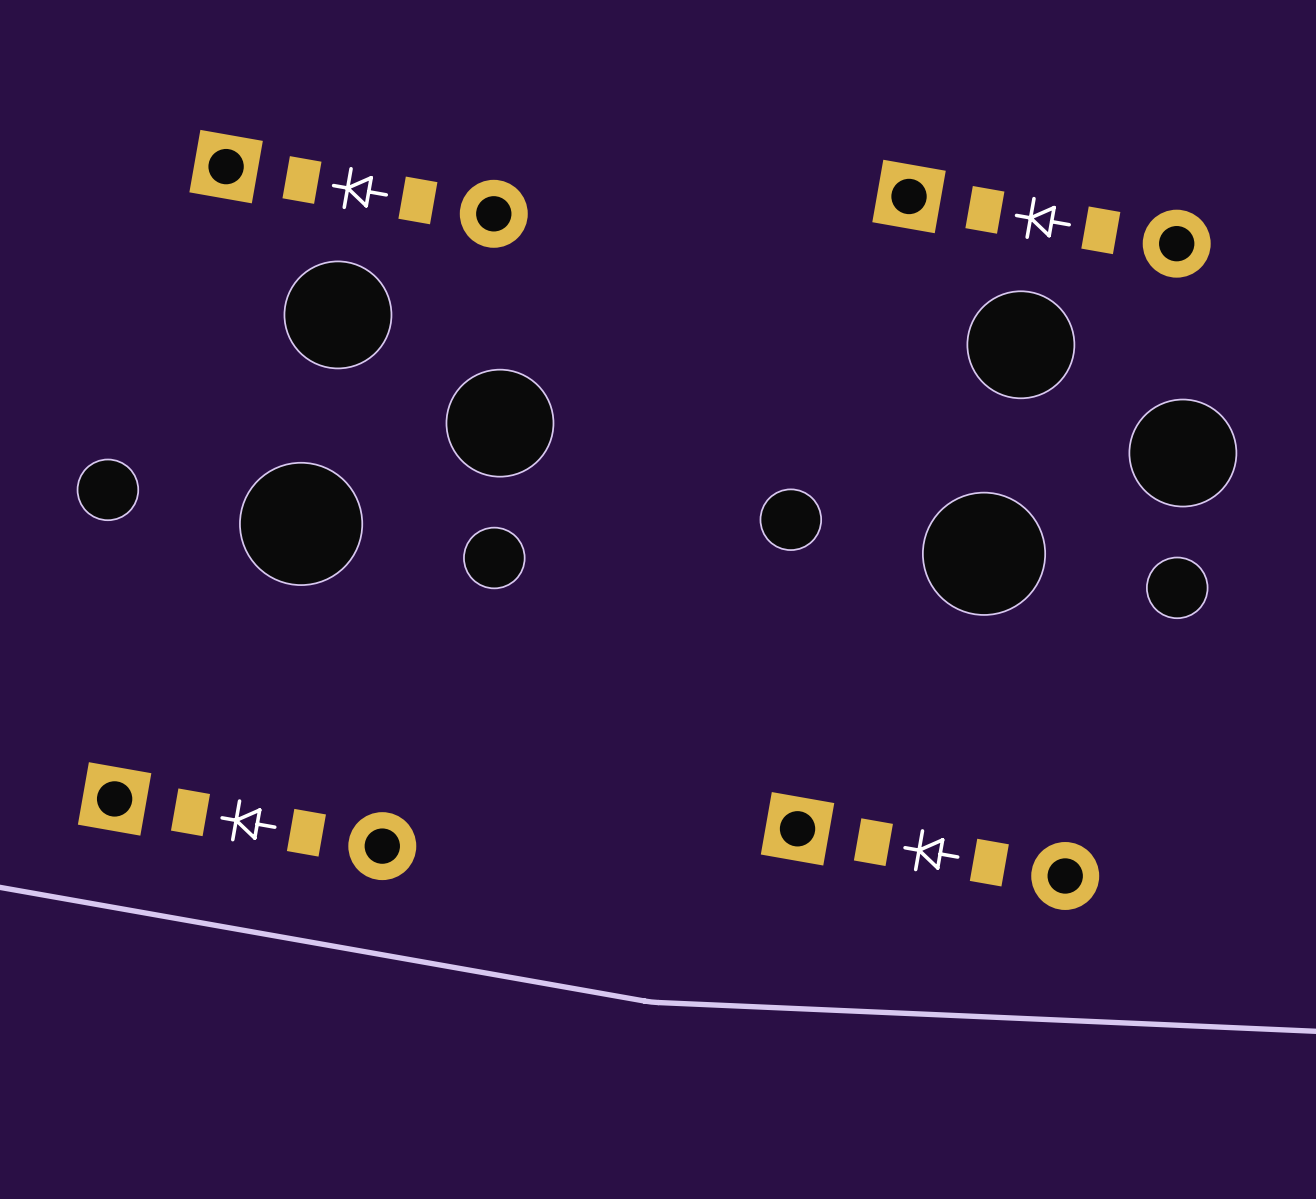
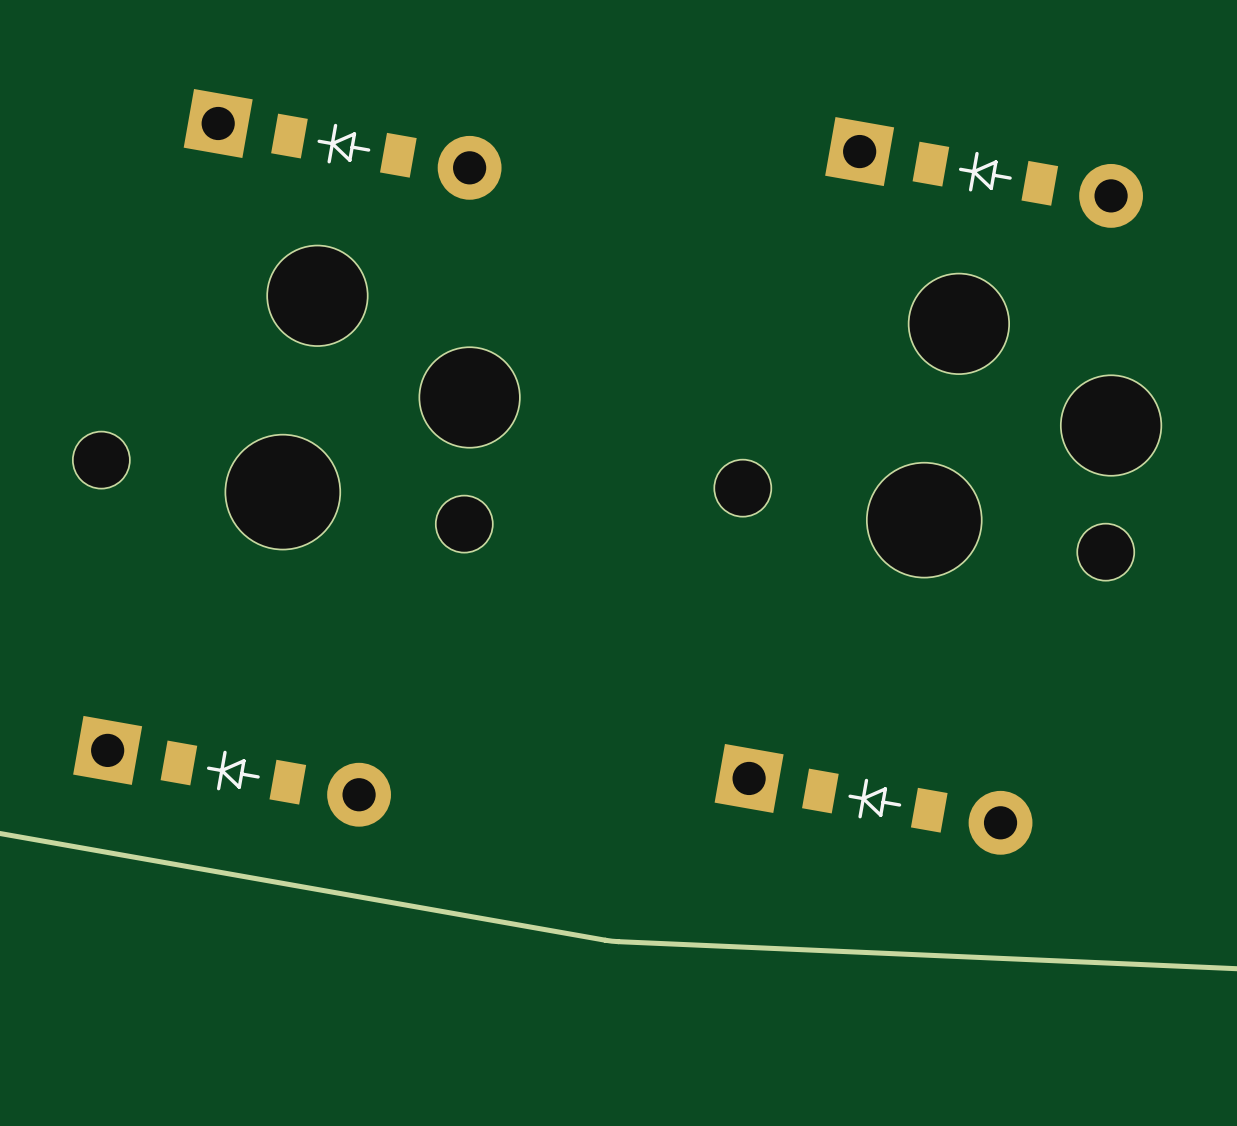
part position: (358, 188) -> (342, 144)
part position: (1041, 218) -> (984, 172)

